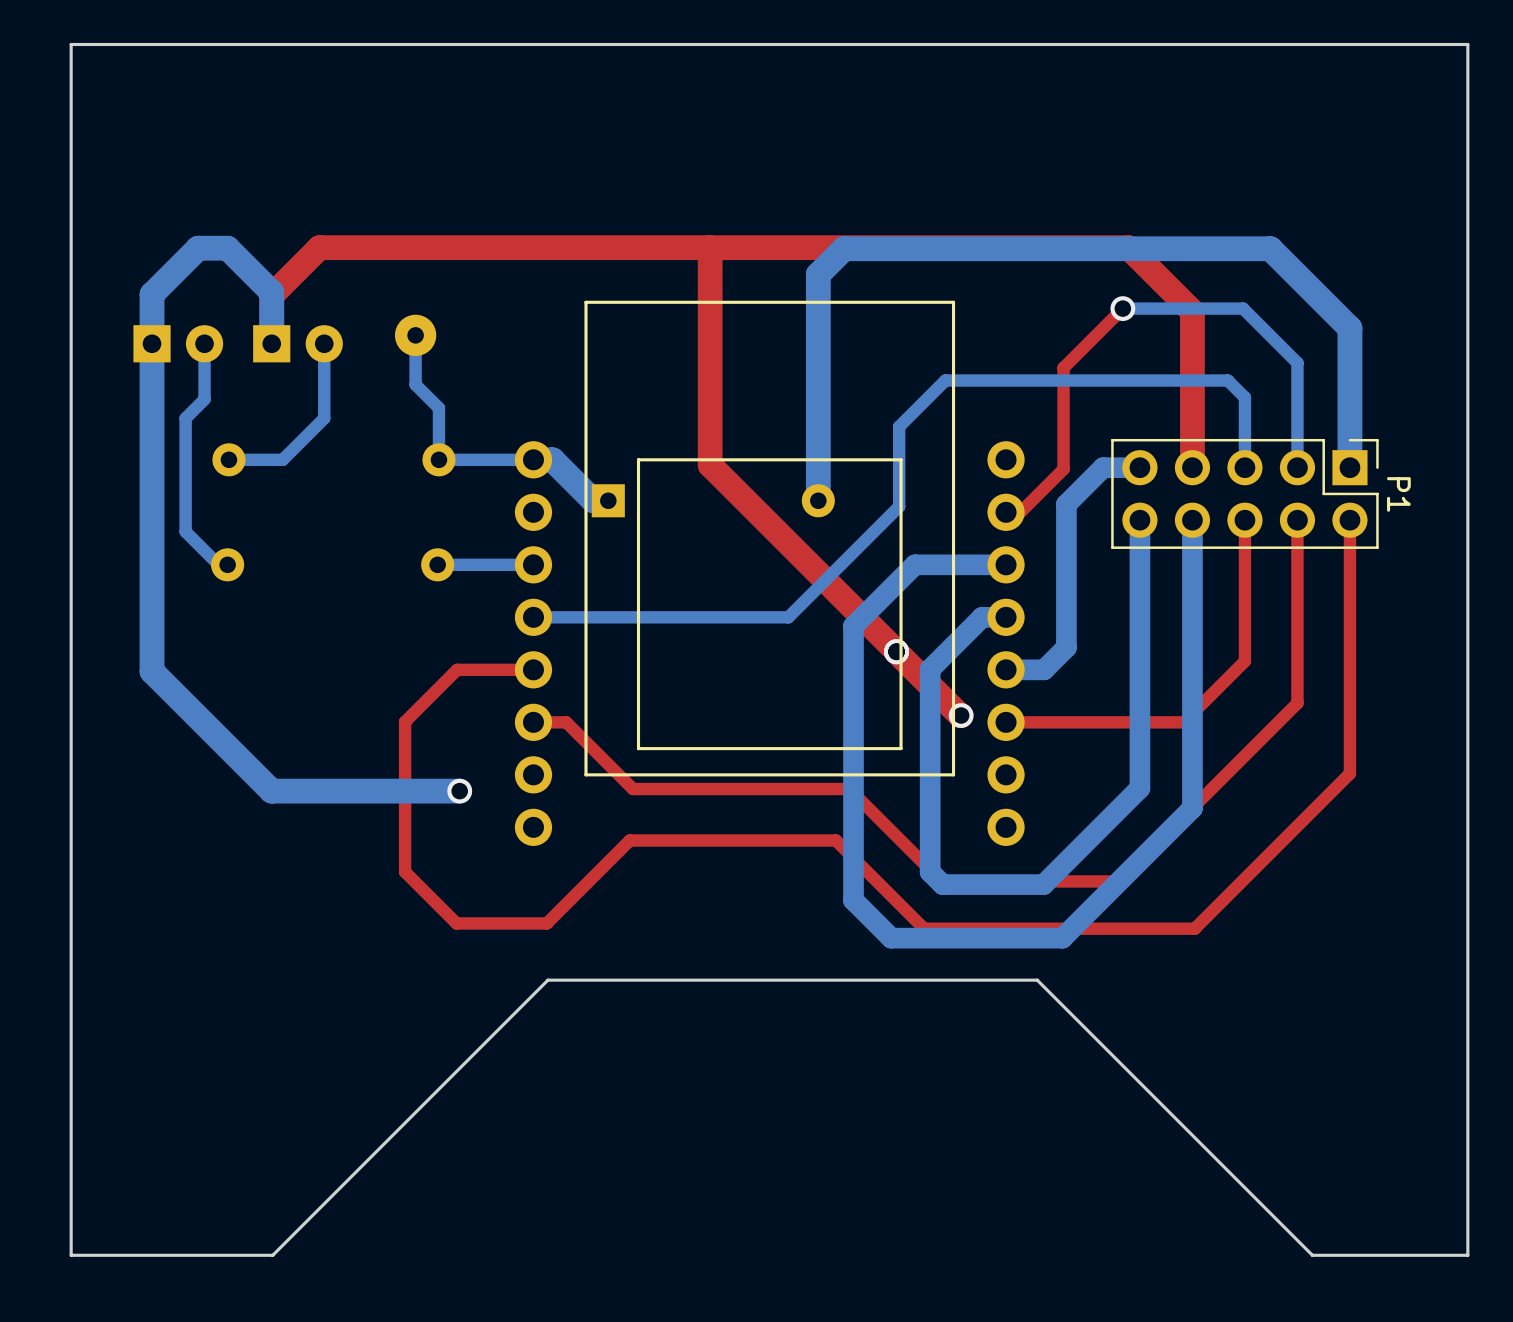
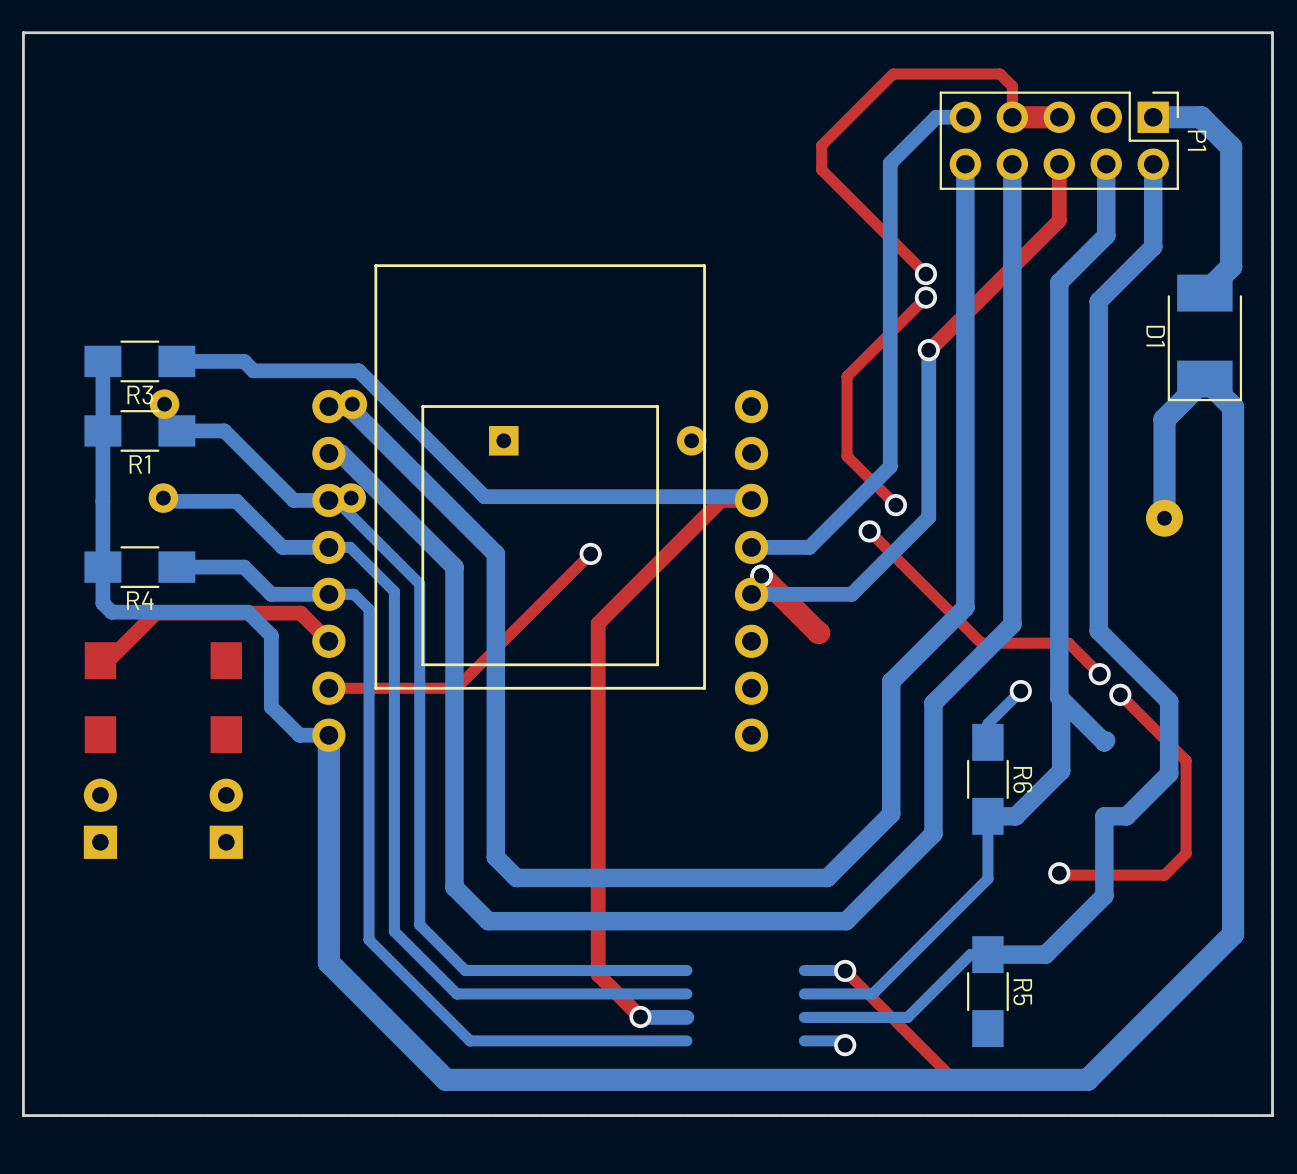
bottom track: none -> (965, 117) (936, 117) (890, 163) (890, 466) (809, 547) (751, 547)
top track: none -> (1059, 117) (1012, 117) (1012, 86) (1000, 74) (893, 74) (821, 145) (821, 169) (925, 274)
bottom track: none -> (1153, 117) (1201, 117) (1231, 147) (1231, 266) (1204, 293)
bottom track: none -> (965, 164) (965, 607) (891, 681) (891, 814) (827, 877) (516, 877) (495, 857) (495, 553) (348, 406) (328, 406)
bottom track: none -> (1012, 164) (1012, 624) (933, 703) (933, 833) (846, 921) (488, 921) (454, 887) (454, 567) (340, 453) (328, 453)
top track: none -> (1059, 164) (1059, 220) (928, 350)
bottom track: none -> (1106, 164) (1106, 235) (1059, 282) (1059, 697) (1104, 742) (1106, 740)
bottom track: none -> (1153, 164) (1153, 246) (1098, 301) (1098, 630) (1169, 701) (1169, 773) (1126, 816) (1104, 816) (1104, 895) (1045, 954) (970, 954) (907, 1017) (804, 1017)
top track: (710, 247) (710, 465) (896, 651) -> none
bottom track: (1122, 308) (1243, 308) (1297, 362) (1297, 467) -> none
top track: (1122, 308) (1063, 367) (1063, 469) (1020, 512) (1006, 512) -> none
via: (1122, 308) -> none
via: none -> (925, 274)
bottom track: (415, 335) (415, 384) (438, 408) (438, 459) (552, 459) (593, 500) (608, 500) -> none
part: (415, 335) -> none
top track: none -> (925, 297) (847, 376) (847, 456) (895, 505)
via: none -> (925, 297)
part: (178, 343) -> none
bottom track: (204, 343) (204, 399) (185, 418) (185, 531) (218, 564) -> none
bottom track: (271, 343) (271, 292) (227, 248) (198, 248) (152, 294) (152, 671) (271, 791) (459, 791) -> none
top track: (271, 343) (271, 295) (319, 247) (1128, 247) (1192, 311) (1192, 467) -> none
part: (297, 343) -> none
bottom track: (324, 343) (324, 418) (282, 459) (228, 459) -> none
D1: none -> (1204, 337)
bottom track: none -> (928, 350) (928, 517) (851, 594) (751, 594)
via: none -> (928, 350)
bottom track: none -> (102, 361) (102, 603) (111, 612) (247, 612) (271, 635) (271, 707) (299, 735) (328, 735) (328, 962) (446, 1079) (1087, 1079) (1233, 934) (1233, 407) (1204, 379) (1164, 419) (1164, 518)
R3: none -> (139, 361)
bottom track: none -> (176, 361) (244, 361) (253, 370) (358, 370) (484, 496) (747, 496) (751, 500)
bottom track: (1349, 462) (1349, 467) (1349, 328) (1270, 248) (844, 248) (818, 274) (818, 500) -> none
bottom track: (1139, 467) (1103, 467) (1066, 504) (1066, 647) (1044, 669) (1006, 669) -> none
bottom track: (1244, 467) (1244, 397) (1227, 380) (945, 380) (899, 426) (899, 506) (788, 617) (533, 617) -> none
R1: none -> (139, 430)
bottom track: none -> (176, 430) (224, 430) (293, 500) (336, 500) (419, 584) (419, 924) (465, 970) (686, 970)
P1 position: (1244, 493) -> (1059, 140)
bottom track: (1139, 520) (1139, 788) (1043, 884) (942, 884) (930, 871) (930, 669) (982, 617) (1006, 617) -> none
bottom track: (1192, 520) (1192, 808) (1062, 938) (891, 938) (853, 900) (853, 626) (914, 564) (1006, 564) -> none
top track: (1244, 520) (1244, 661) (1183, 722) (1006, 722) -> none
top track: (1297, 520) (1297, 703) (1119, 881) (941, 881) (849, 789) (632, 789) (566, 722) (533, 722) -> none
top track: (1349, 520) (1349, 773) (1194, 928) (924, 928) (835, 840) (629, 840) (546, 923) (456, 923) (405, 871) (405, 721) (457, 669) (533, 669) -> none
bottom track: (533, 564) (437, 564) -> none
top track: none -> (751, 500) (721, 500) (598, 623) (598, 974) (640, 1016)
bottom track: none -> (176, 501) (236, 501) (282, 547) (350, 547) (394, 591) (394, 931) (456, 993) (686, 993)
via: none -> (895, 505)
part position: (769, 573) -> (540, 508)
part: none -> (1164, 518)
top track: none -> (869, 531) (981, 643) (1068, 643) (1099, 674)
via: none -> (869, 531)
top track: none -> (590, 553) (456, 688) (328, 688)
via: none -> (590, 553)
R4: none -> (139, 567)
bottom track: none -> (176, 567) (244, 567) (271, 594) (354, 594) (369, 609) (369, 939) (469, 1040) (686, 1040)
via: (961, 715) -> none
top track: none -> (328, 641) (300, 613) (155, 613) (108, 660) (100, 660)
via: none -> (1099, 674)
bottom track: none -> (1020, 691) (987, 723) (987, 742)
via: none -> (1020, 691)
top track: none -> (1120, 694) (1186, 760) (1186, 853) (1164, 875) (1061, 875) (1059, 873)
via: none -> (1120, 694)
part: none -> (100, 697)
part: none -> (226, 697)
bottom track: none -> (1061, 699) (1061, 770) (1015, 816) (987, 816) (987, 878) (872, 993) (804, 993)
via: (459, 791) -> none
R6: none -> (987, 779)
part: none -> (100, 818)
part: none -> (226, 818)
via: none -> (1059, 873)
bottom track: none -> (804, 970) (845, 970)
top track: none -> (845, 970) (955, 1080) (956, 1078) (956, 1080)
via: none -> (845, 970)
R5: none -> (987, 991)
bottom track: none -> (640, 1016) (686, 1017)
via: none -> (640, 1016)
bottom track: none -> (804, 1040) (840, 1040) (845, 1045)
via: none -> (845, 1045)
board edge: (1312, 1255) (1037, 980) (547, 980) (272, 1255) -> (1133, 1115) (203, 1115)

